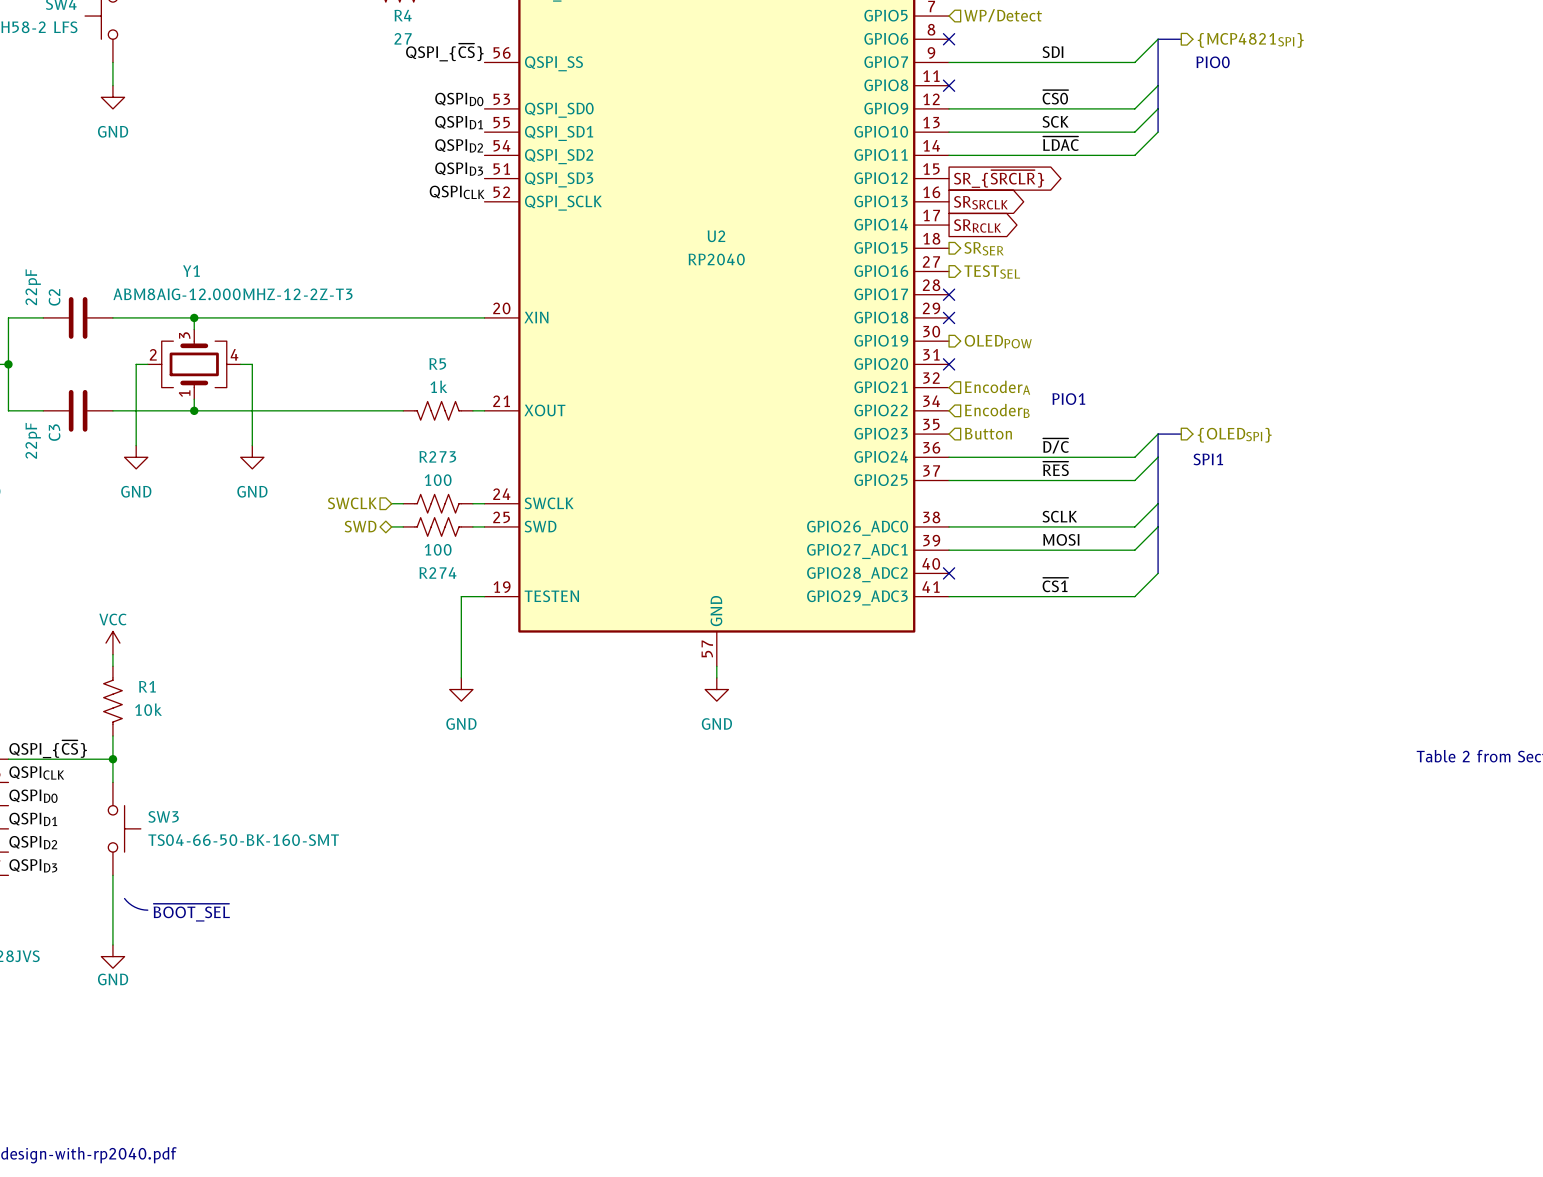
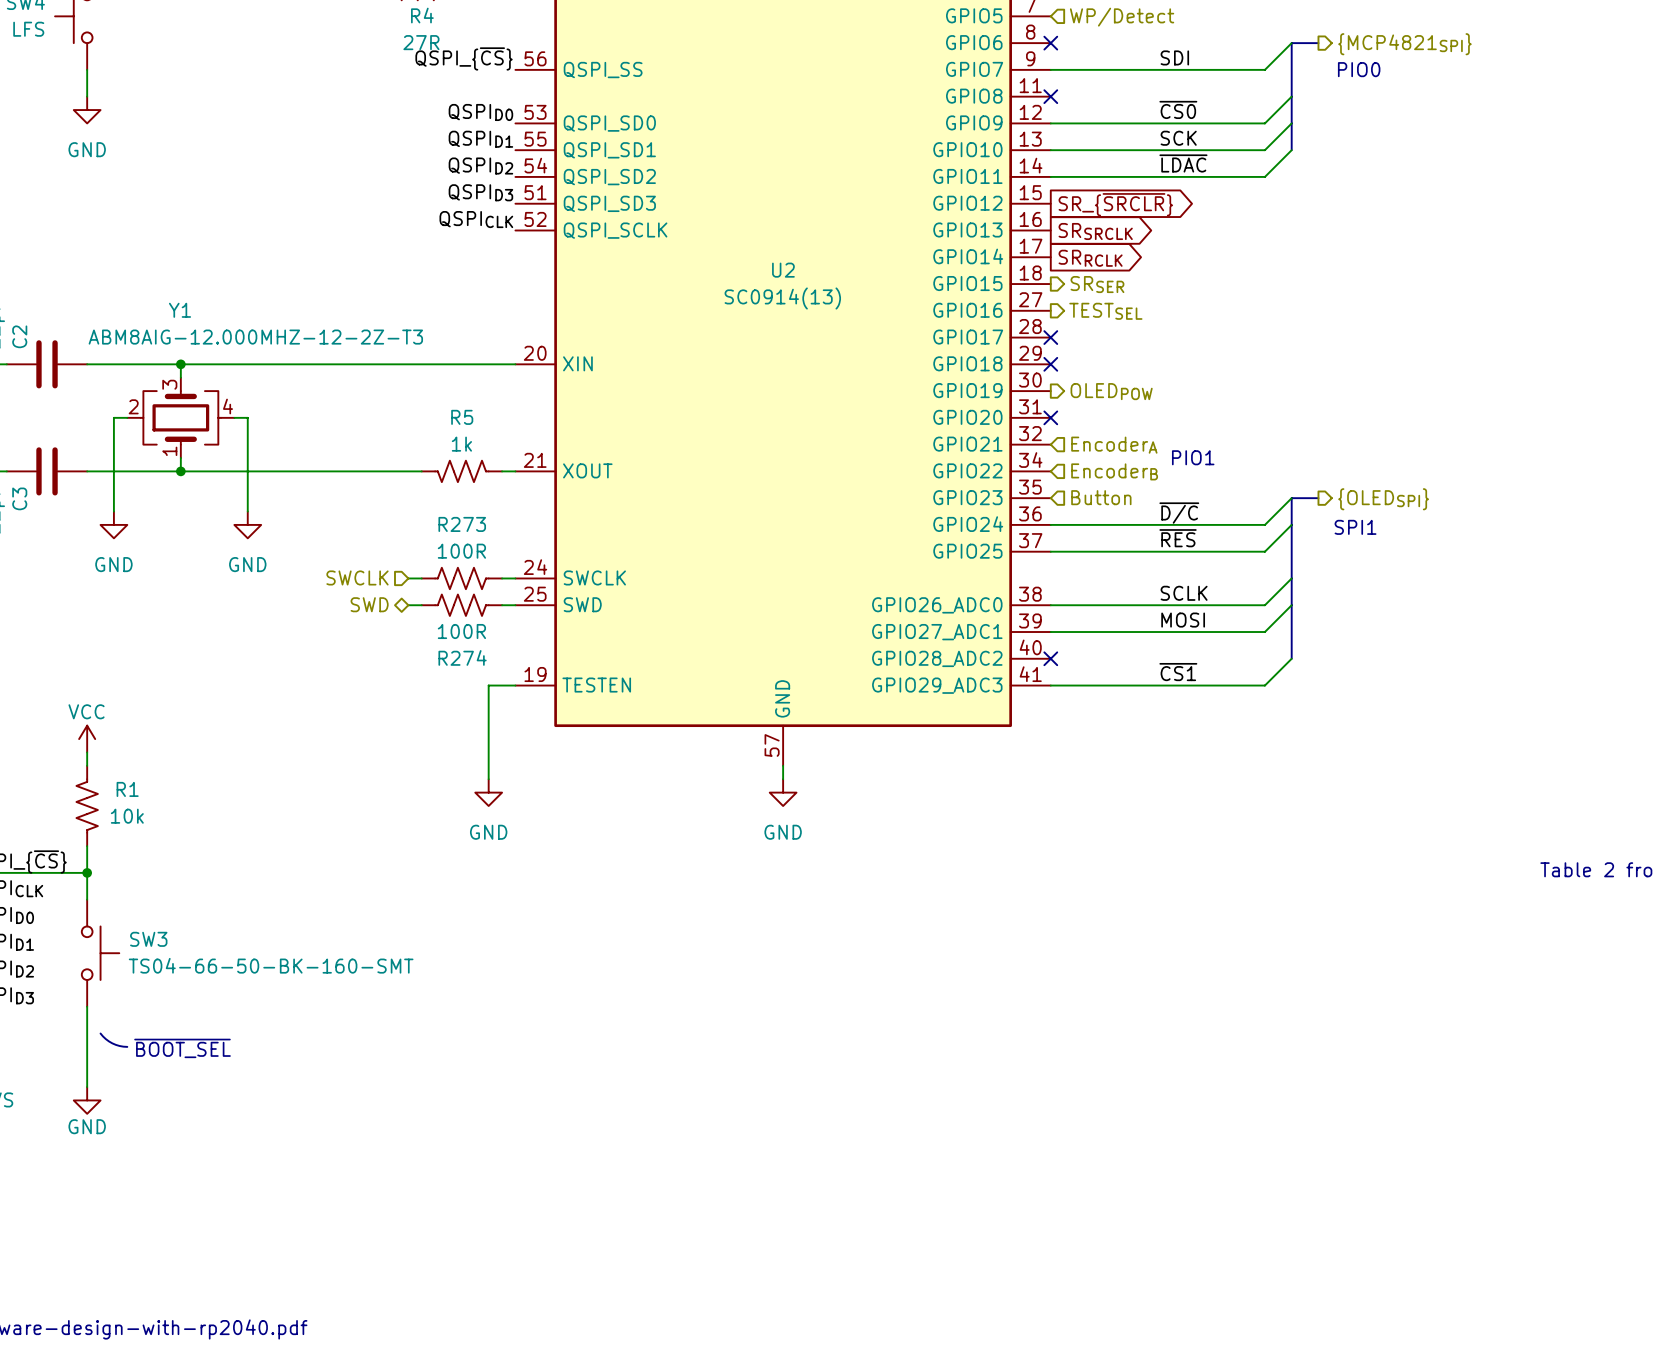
R4 value: 27 (403, 38) -> 27R (421, 42)
U2 value: RP2040 (716, 259) -> SC0914(13) (782, 298)
R273 value: 100 (438, 480) -> 100R (461, 551)
R274 value: 100 (438, 549) -> 100R (461, 631)

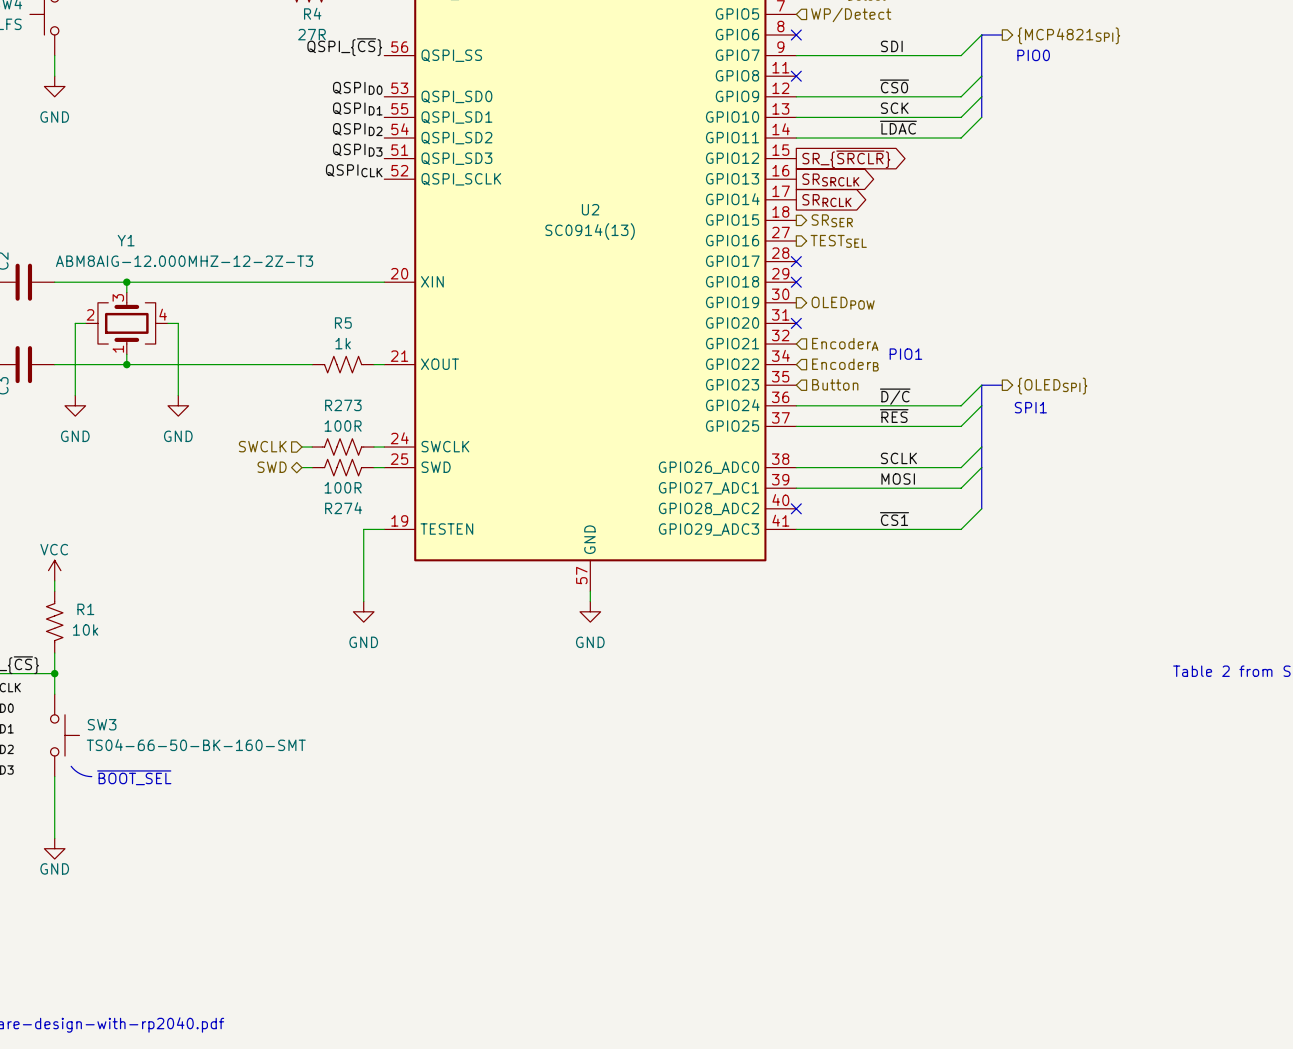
line: (100, 1033) (112, 1043) (127, 1046) -> (71, 766) (80, 773) (91, 776)
text position: ~{BOOT_SEL} (182, 1048) -> ~{BOOT_SEL} (134, 777)

